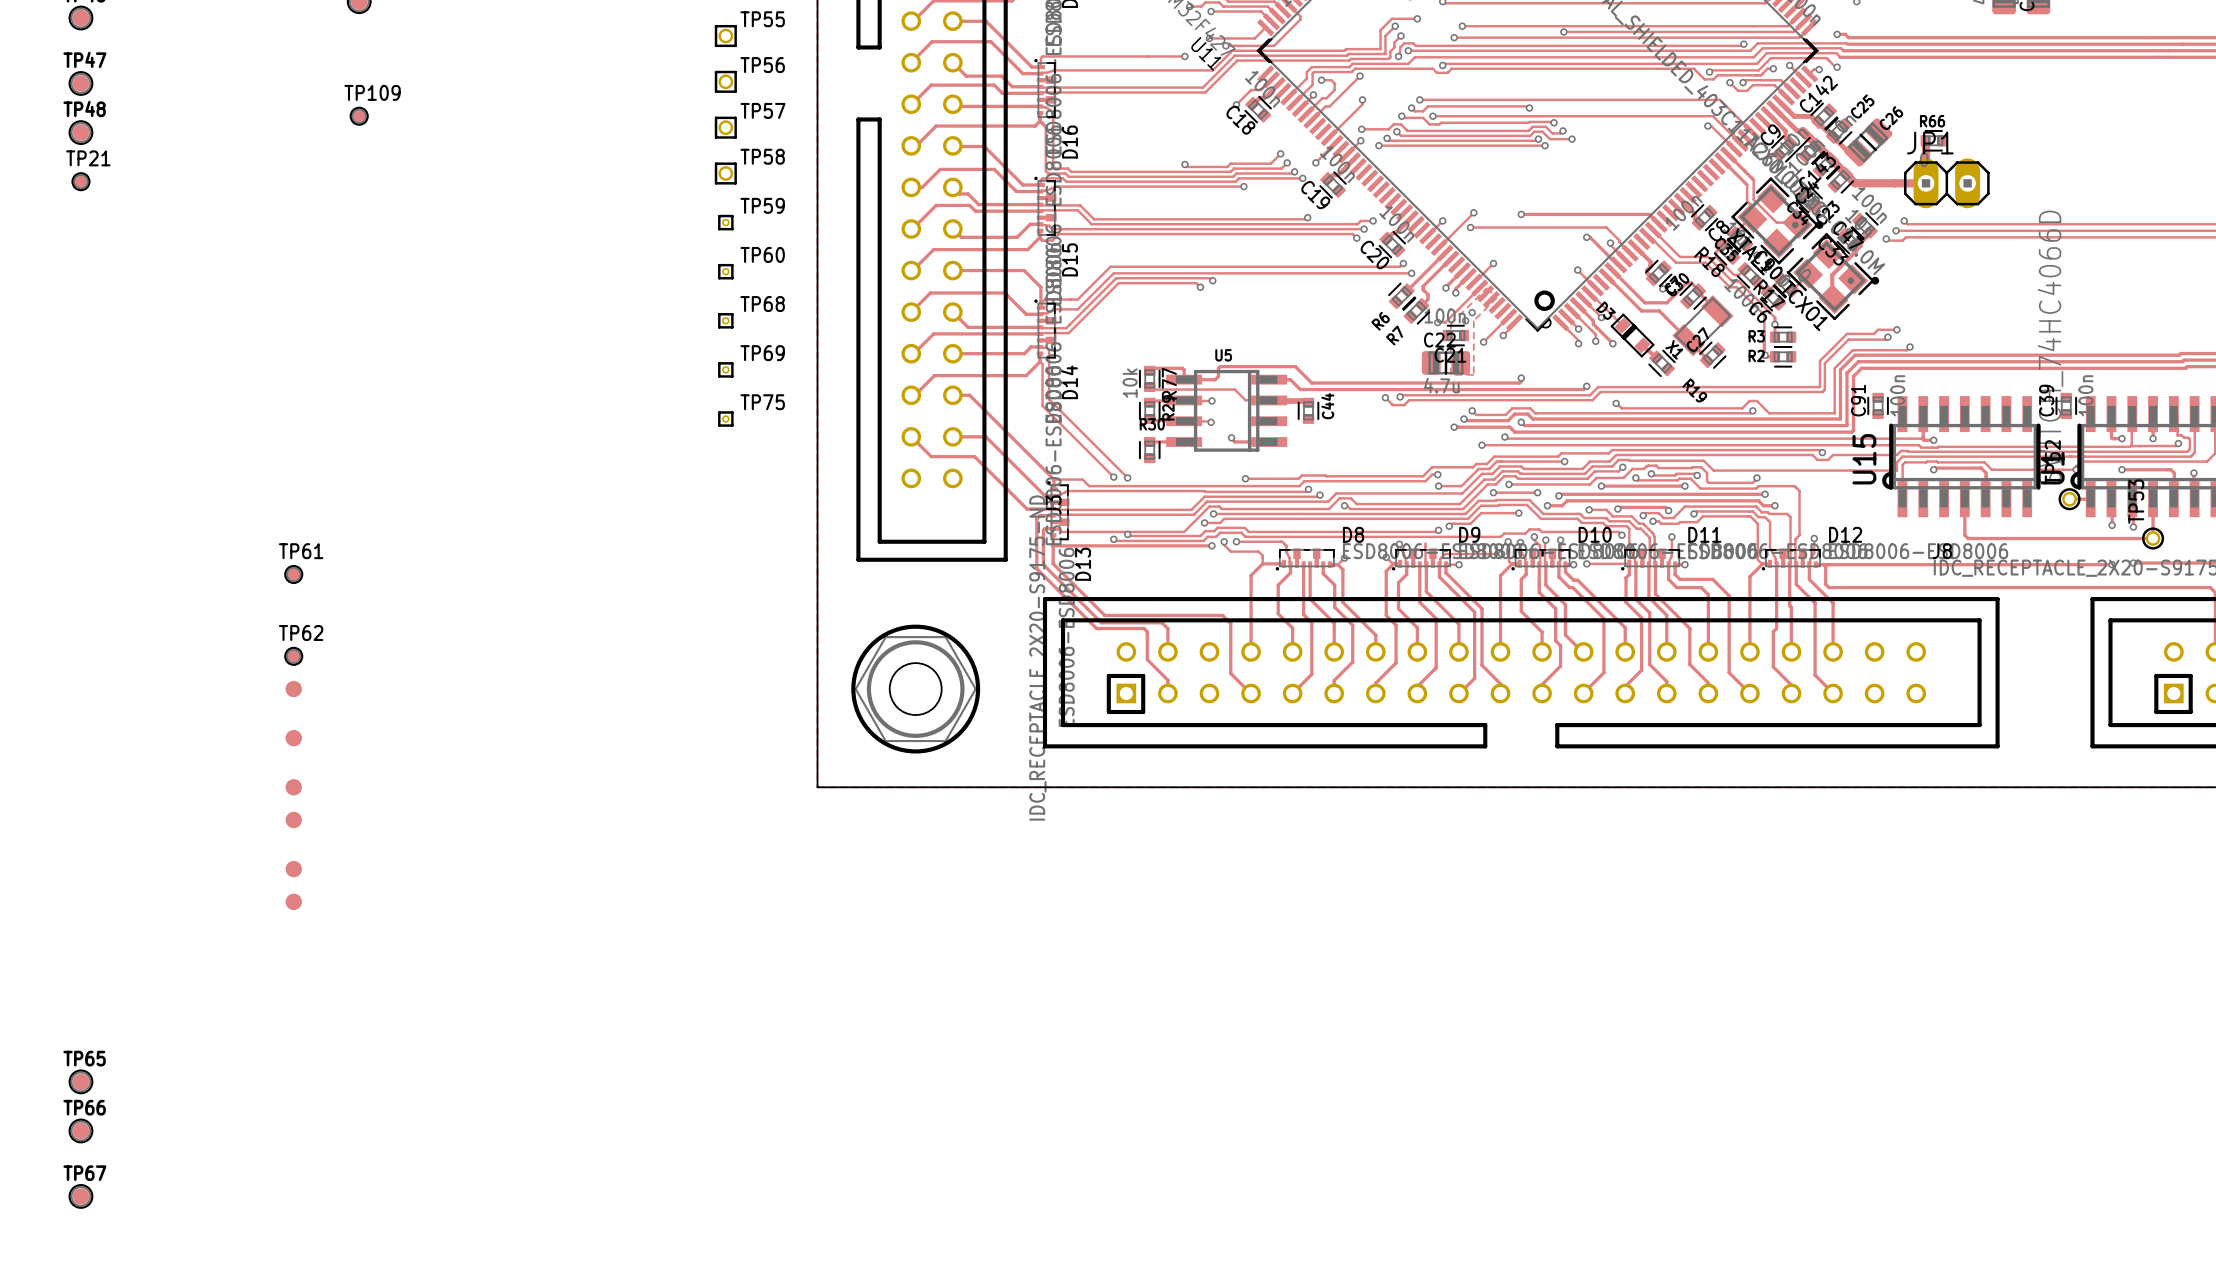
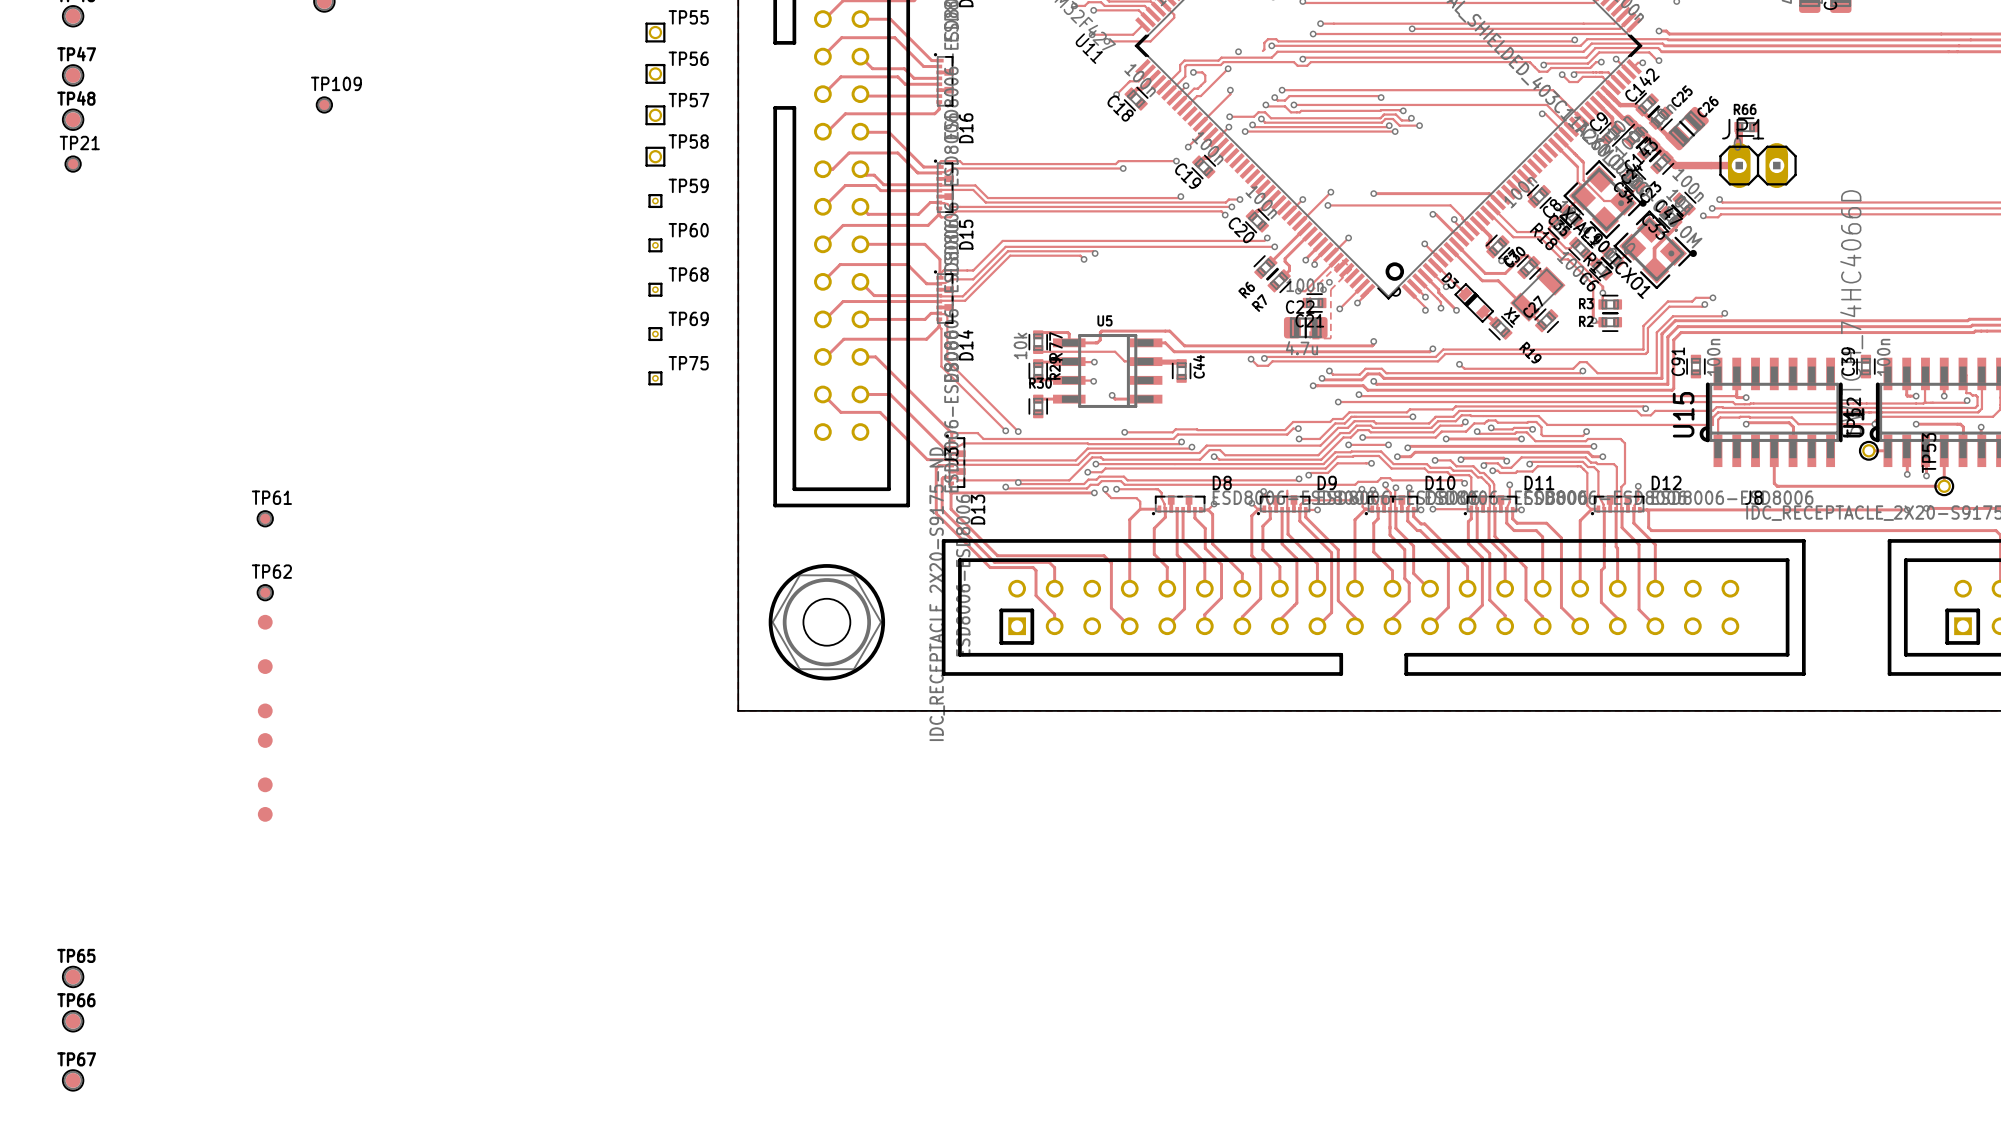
track: (1417, 18) (1391, 18) (1380, 30) (1380, 49) (1232, 50) (1212, 70) (1054, 70) (1040, 73) -> none
via: (1417, 18) -> none
track: (1395, 26) (1385, 36) (1385, 54) (1234, 55) (1202, 87) (1040, 86) -> none
via: (1395, 26) -> none
track: (1400, 36) (1394, 42) (1394, 47) (1390, 51) (1388, 58) (1237, 60) (1205, 92) (1040, 93) -> none
via: (1400, 36) -> none
track: (1184, 56) (1042, 56) (1040, 67) -> none
via: (1184, 56) -> none
via: (1398, 56) -> none
via: none -> (1238, 51)
track: (1040, 106) (1045, 107) (1053, 112) (1053, 166) (1054, 168) (1067, 168) (1071, 171) (1230, 171) (1234, 168) (1281, 168) (1287, 162) -> none
track: (1040, 121) (1045, 126) (1045, 171) (1048, 173) (1065, 173) (1068, 176) (1233, 176) (1236, 173) (1292, 173) (1294, 171) -> none
track: (1280, 153) (1270, 163) (1230, 163) (1227, 166) (1187, 166) (1184, 164) -> none
via: (1280, 153) -> none
via: (1287, 162) -> none
via: (1184, 164) -> none
via: (1294, 171) -> none

